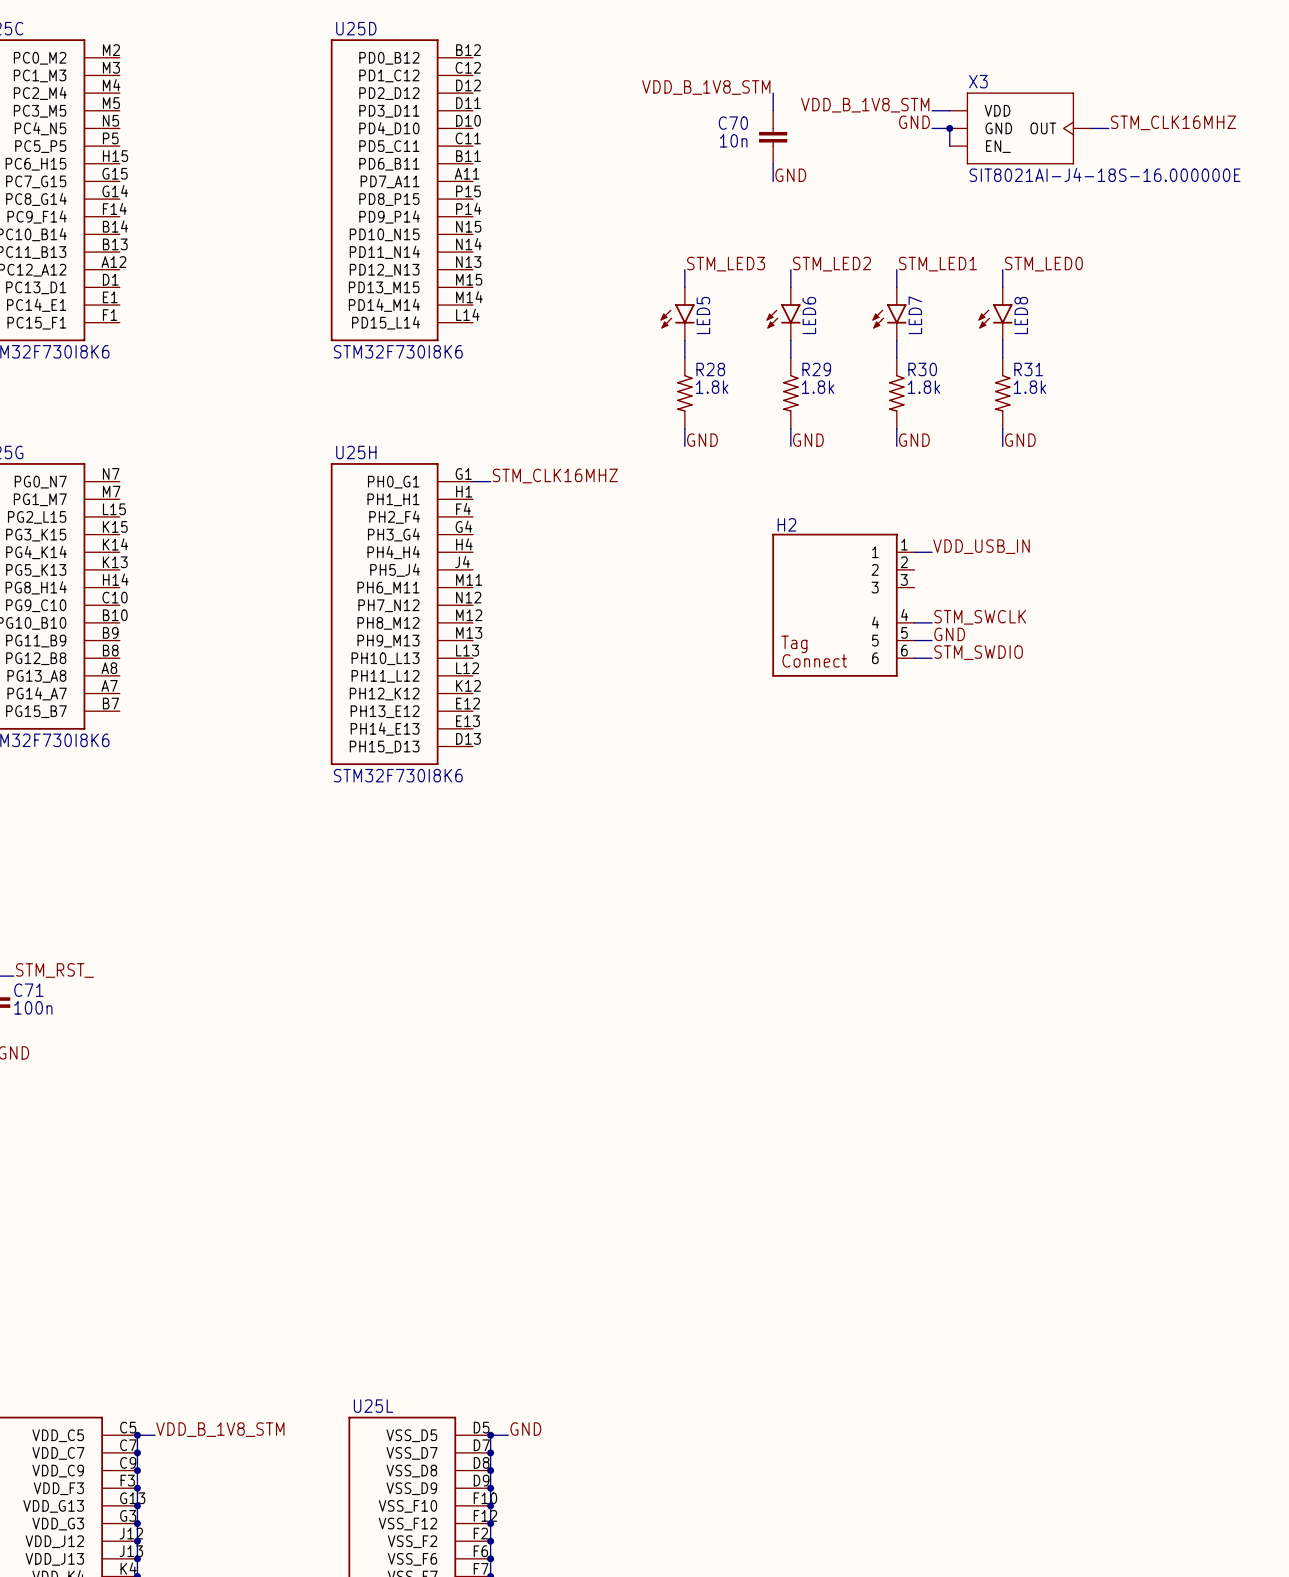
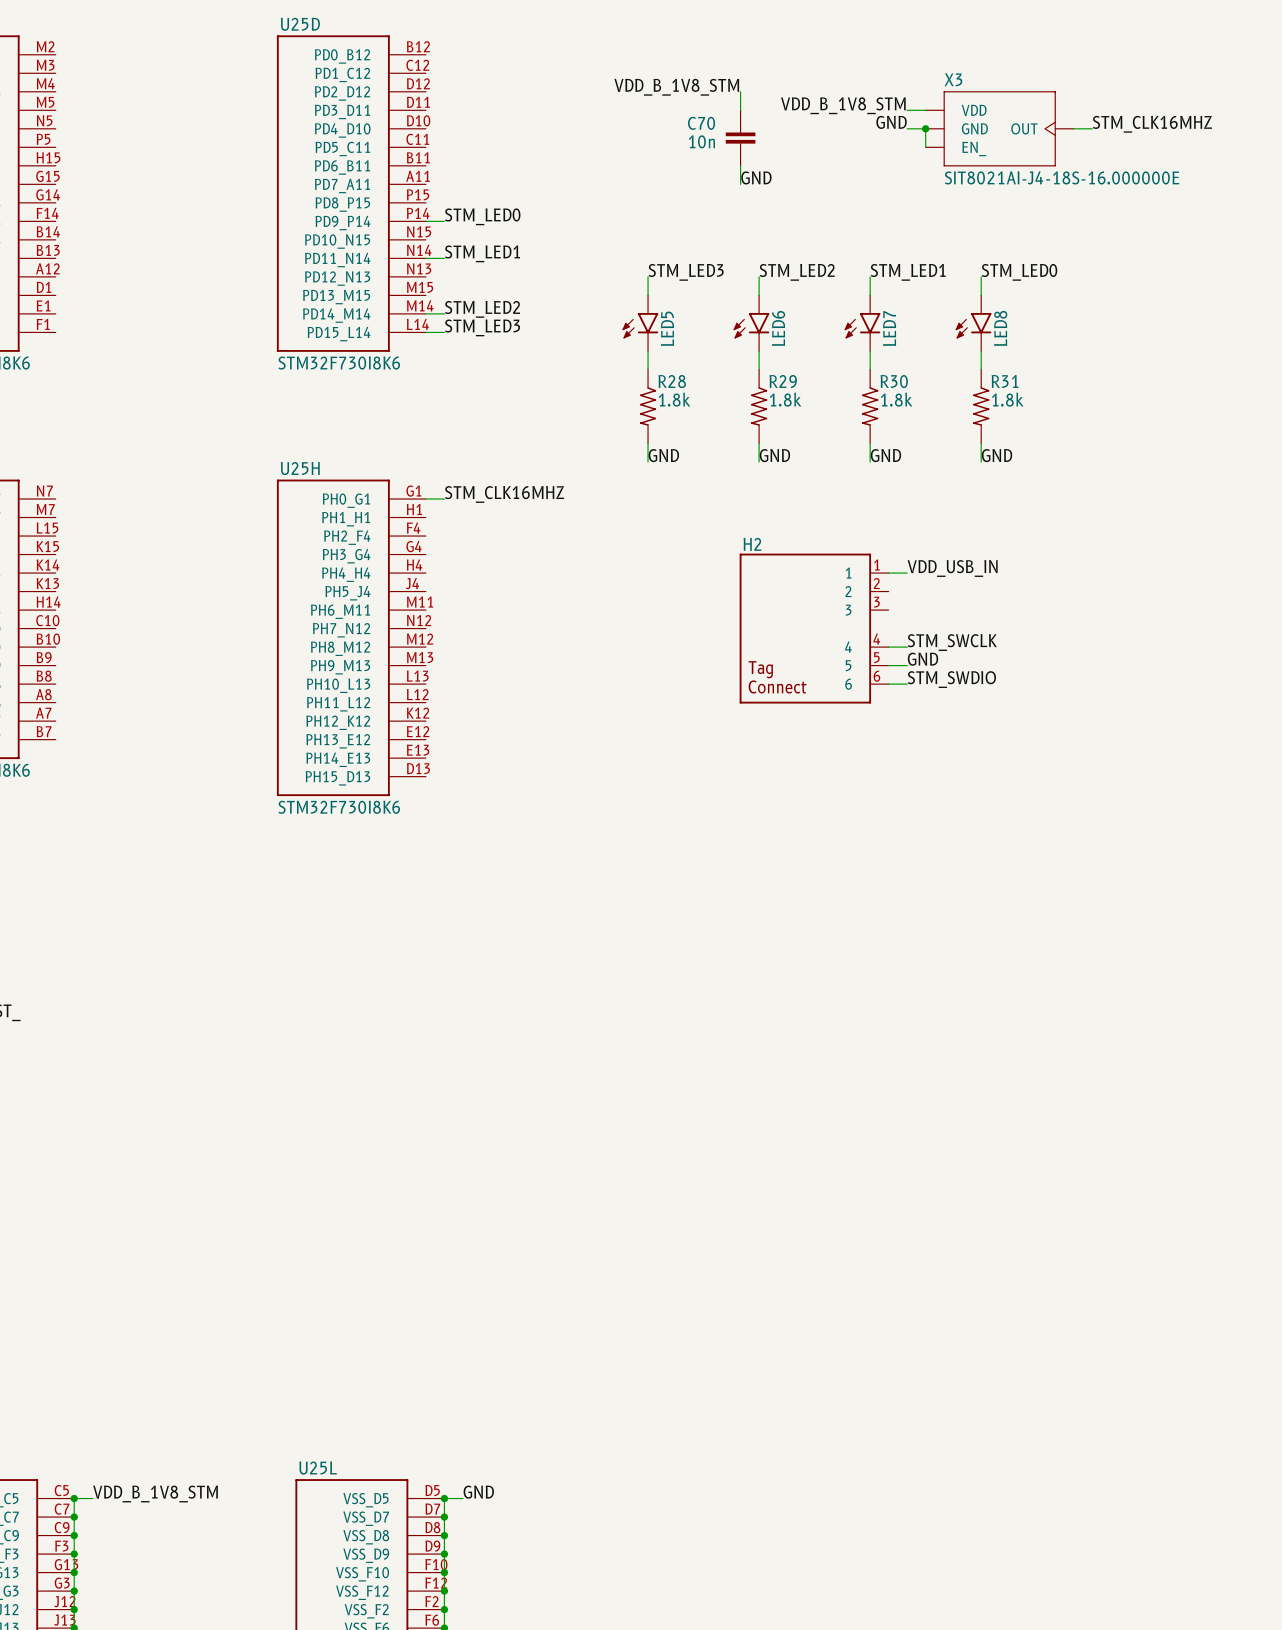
label: none -> STM_LED0 (482, 216)
wire: none -> (425, 221) (444, 221)
label: none -> STM_LED1 (482, 253)
wire: none -> (425, 258) (444, 258)
label: none -> STM_LED2 (482, 309)
wire: none -> (425, 313) (444, 313)
label: none -> STM_LED3 (482, 327)
wire: none -> (425, 332) (444, 332)

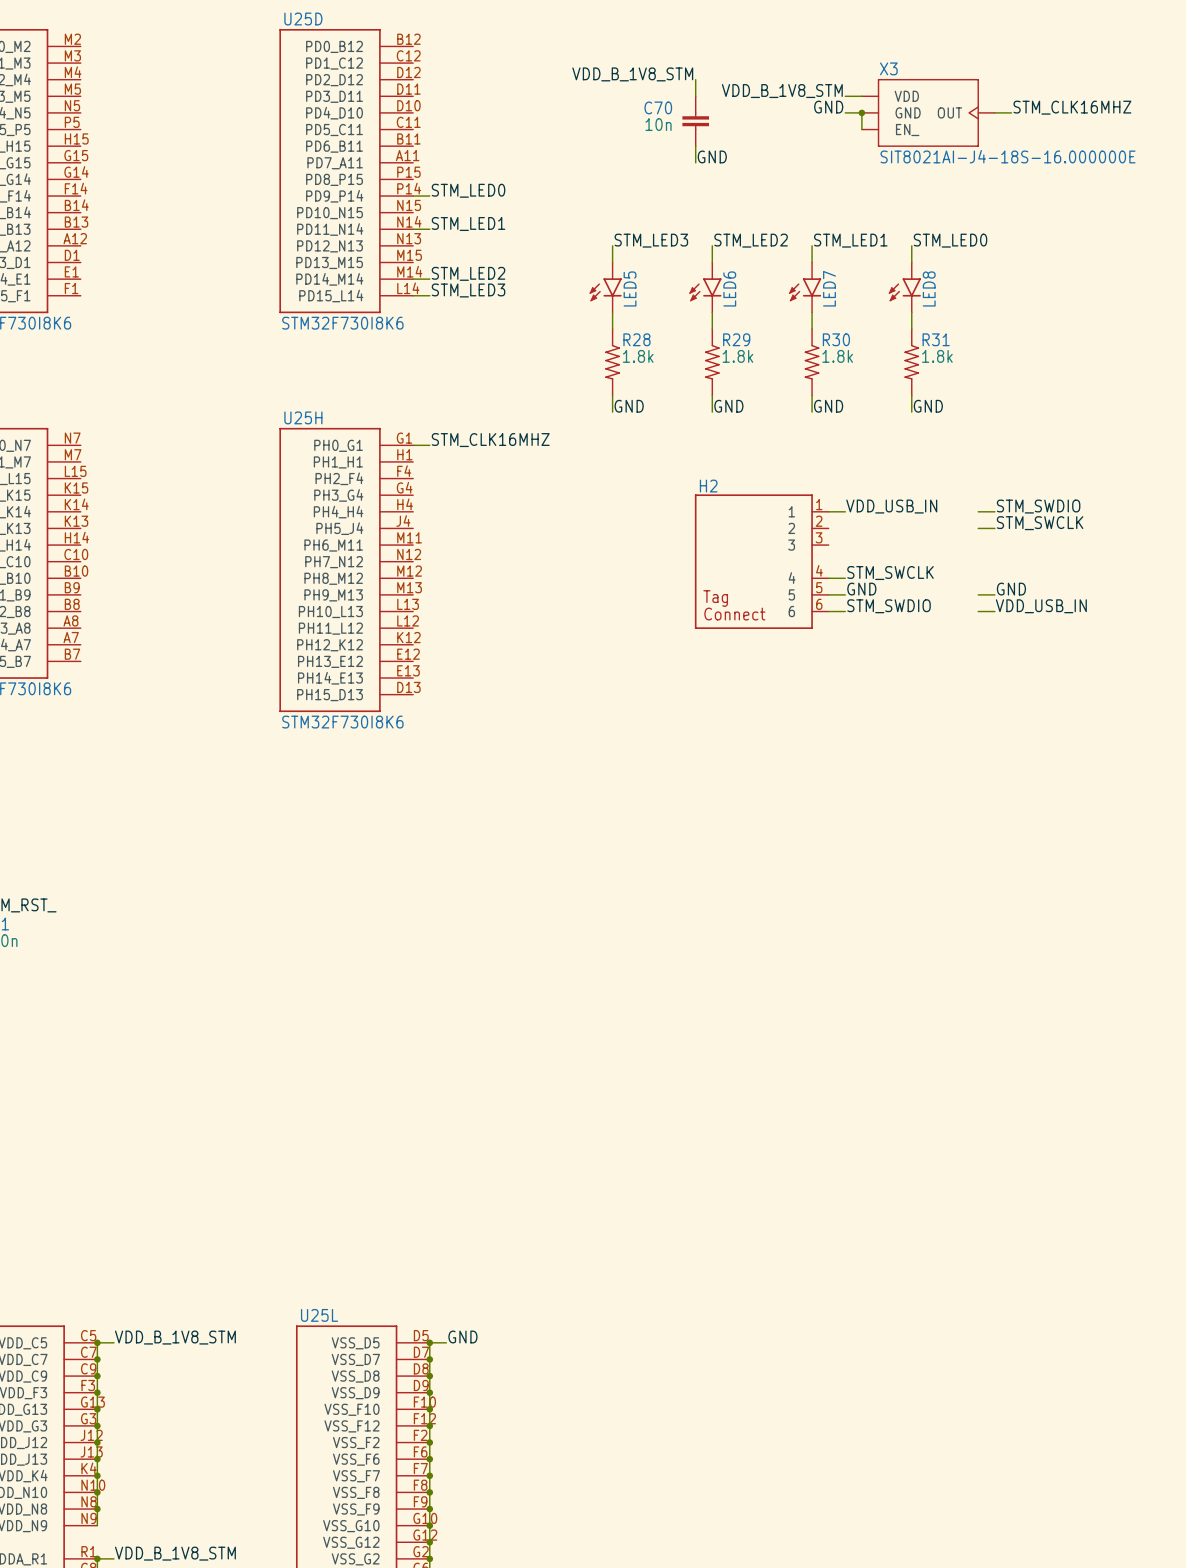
label: none -> STM_SWDIO (1038, 506)
wire: none -> (978, 511) (994, 511)
label: none -> STM_SWCLK (1040, 523)
wire: none -> (978, 528) (994, 528)
label: none -> GND (1011, 589)
wire: none -> (978, 594) (994, 594)
label: none -> VDD_USB_IN (1041, 606)
wire: none -> (978, 611) (994, 611)

